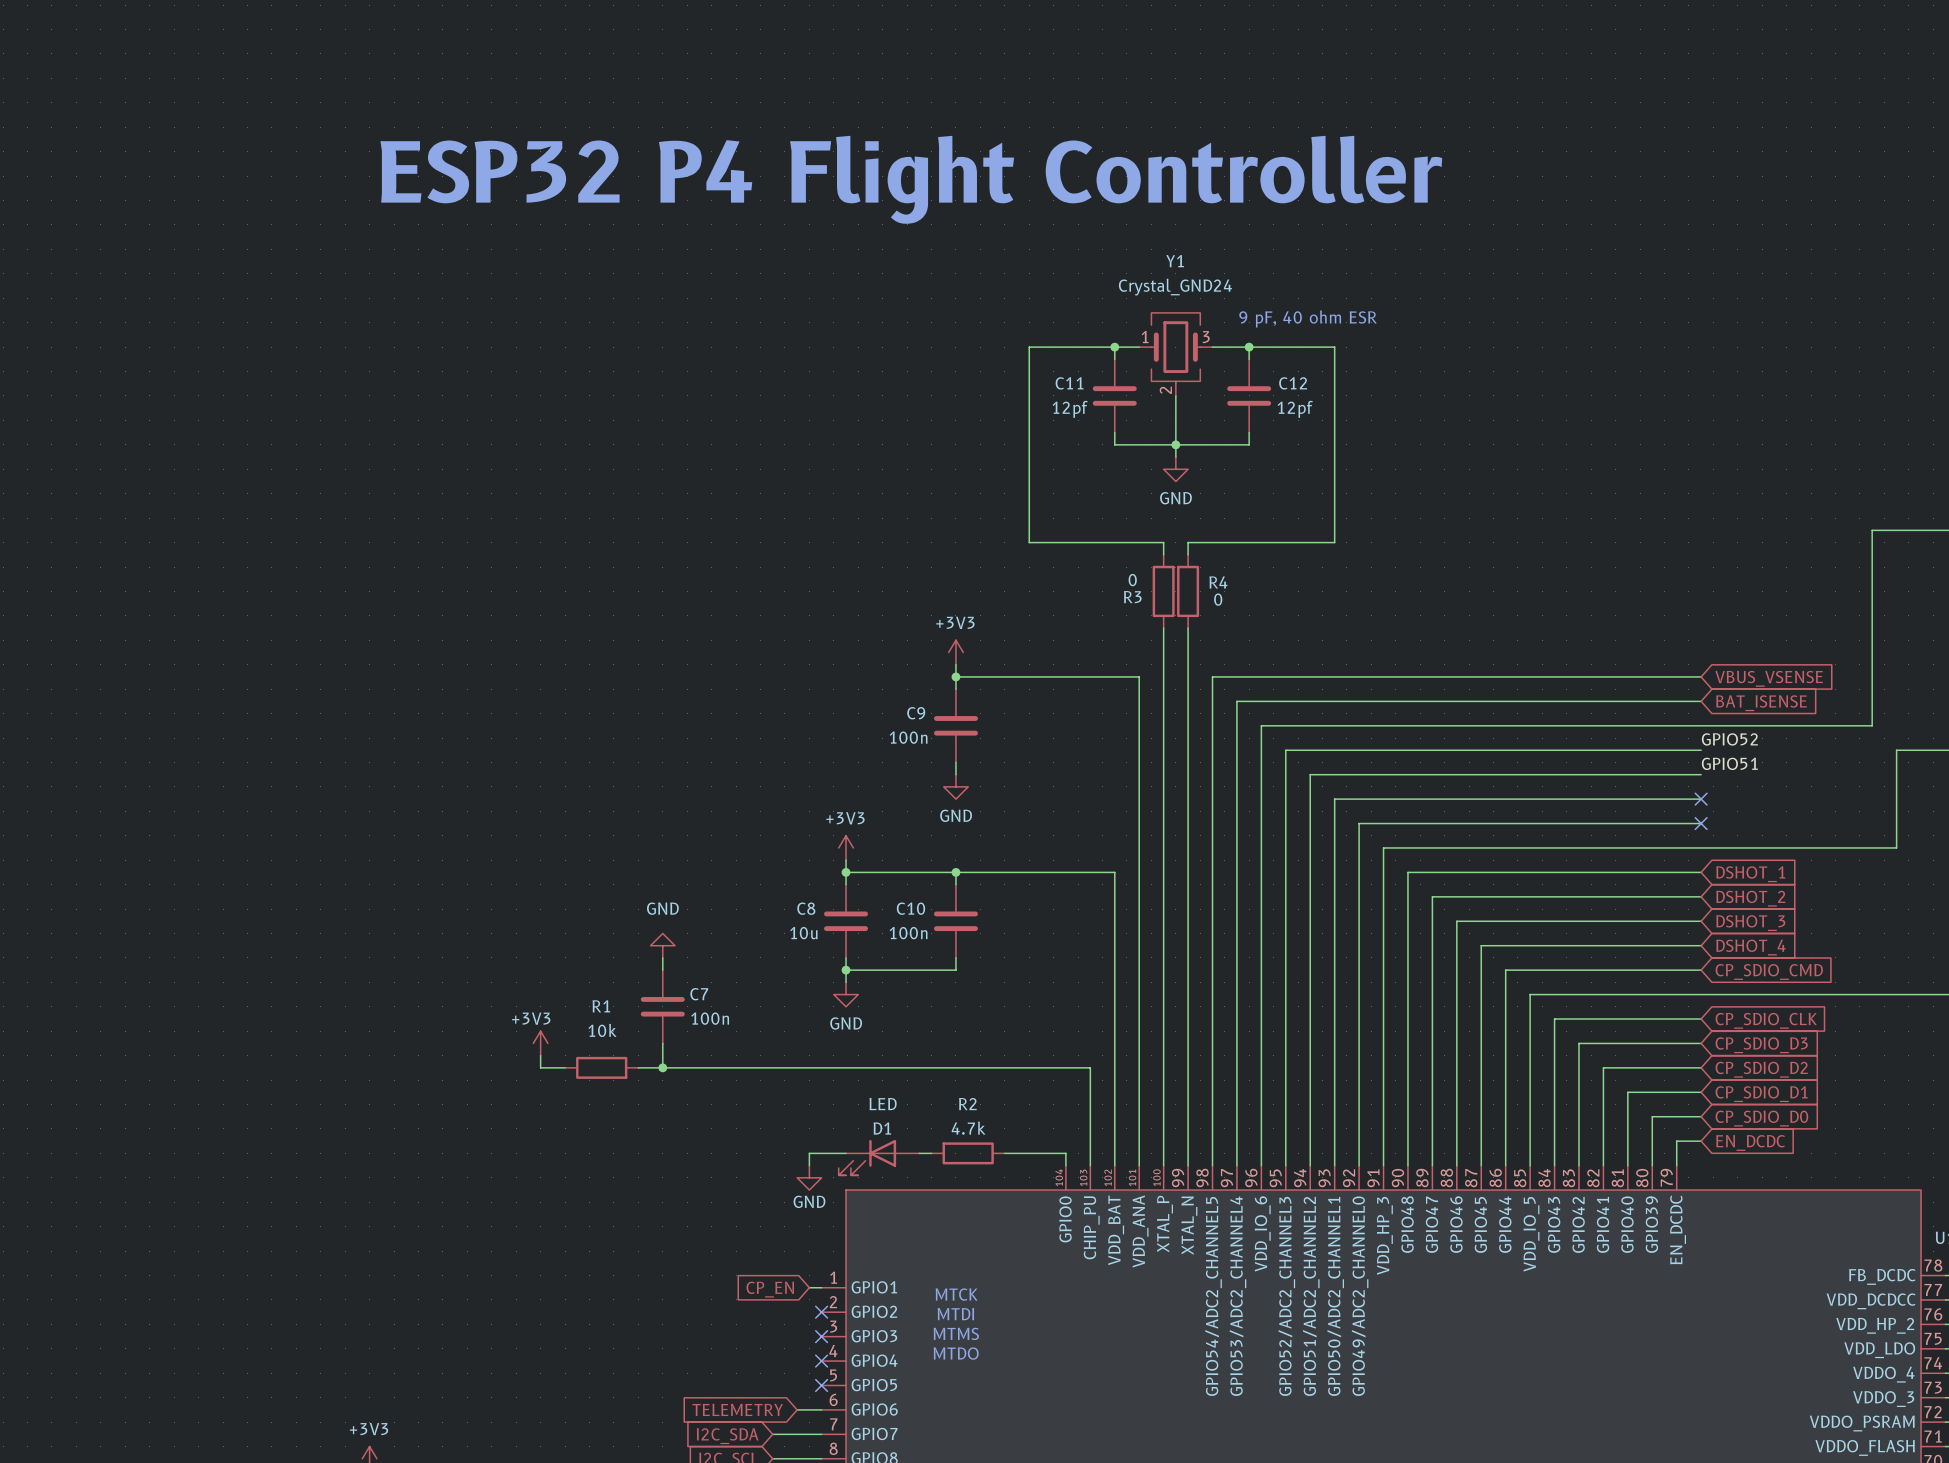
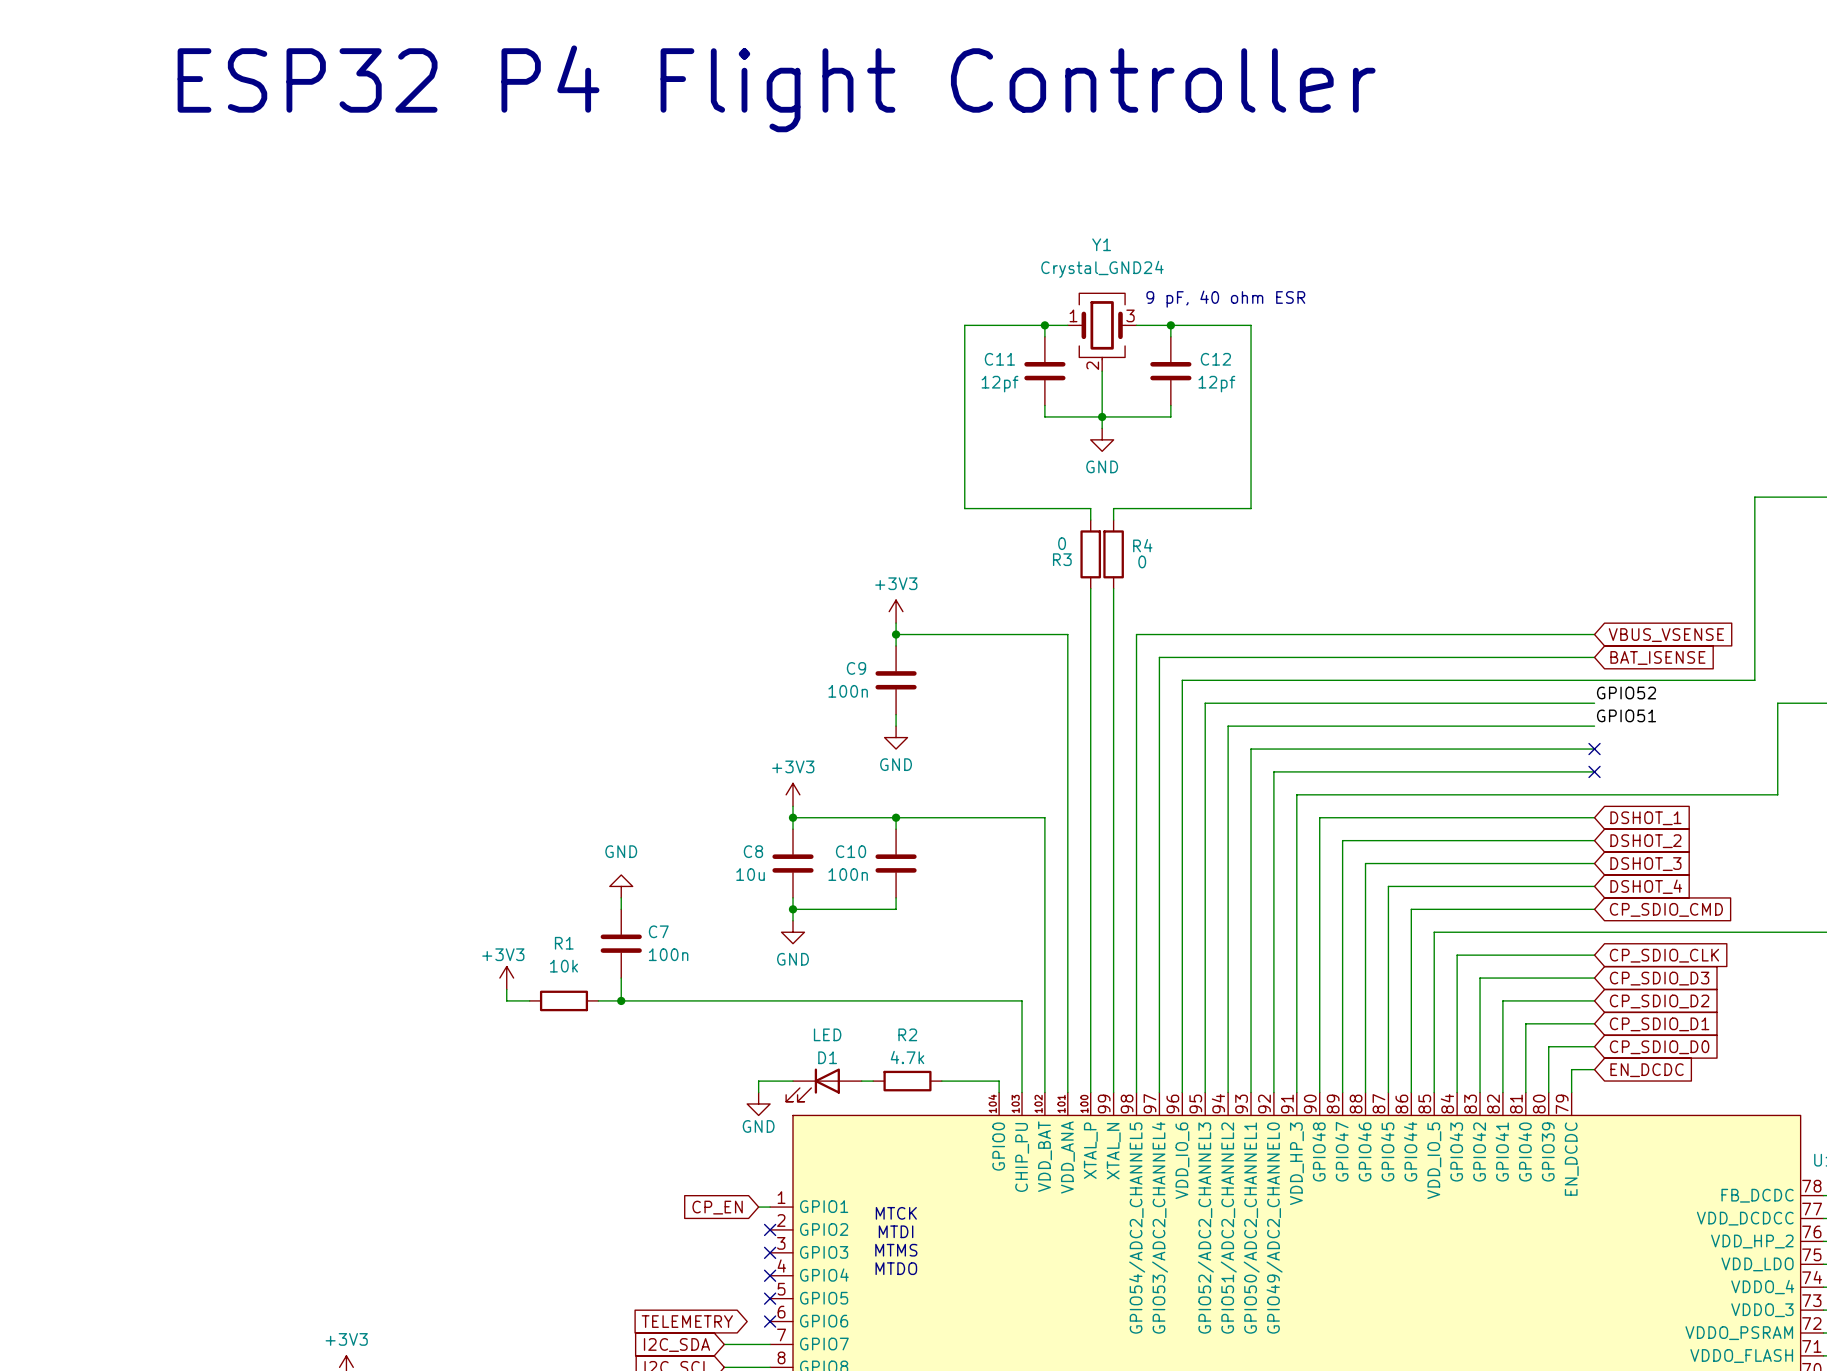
text position: ESP32 P4 Flight Controller (911, 179) -> ESP32 P4 Flight Controller (776, 88)
wire: (797, 1409) (821, 1409) -> none
no-connect mark: none -> (770, 1321)

